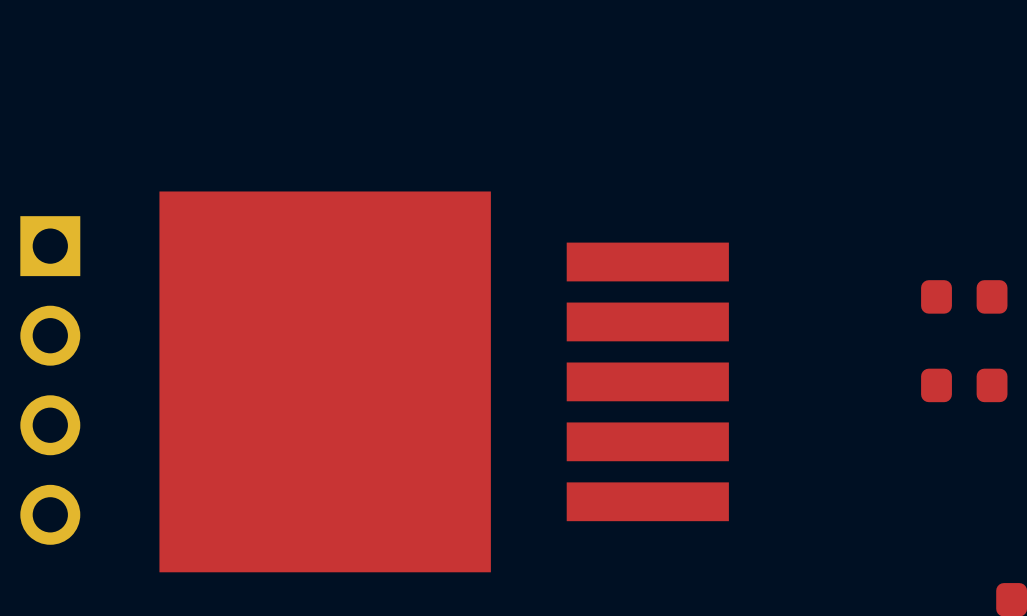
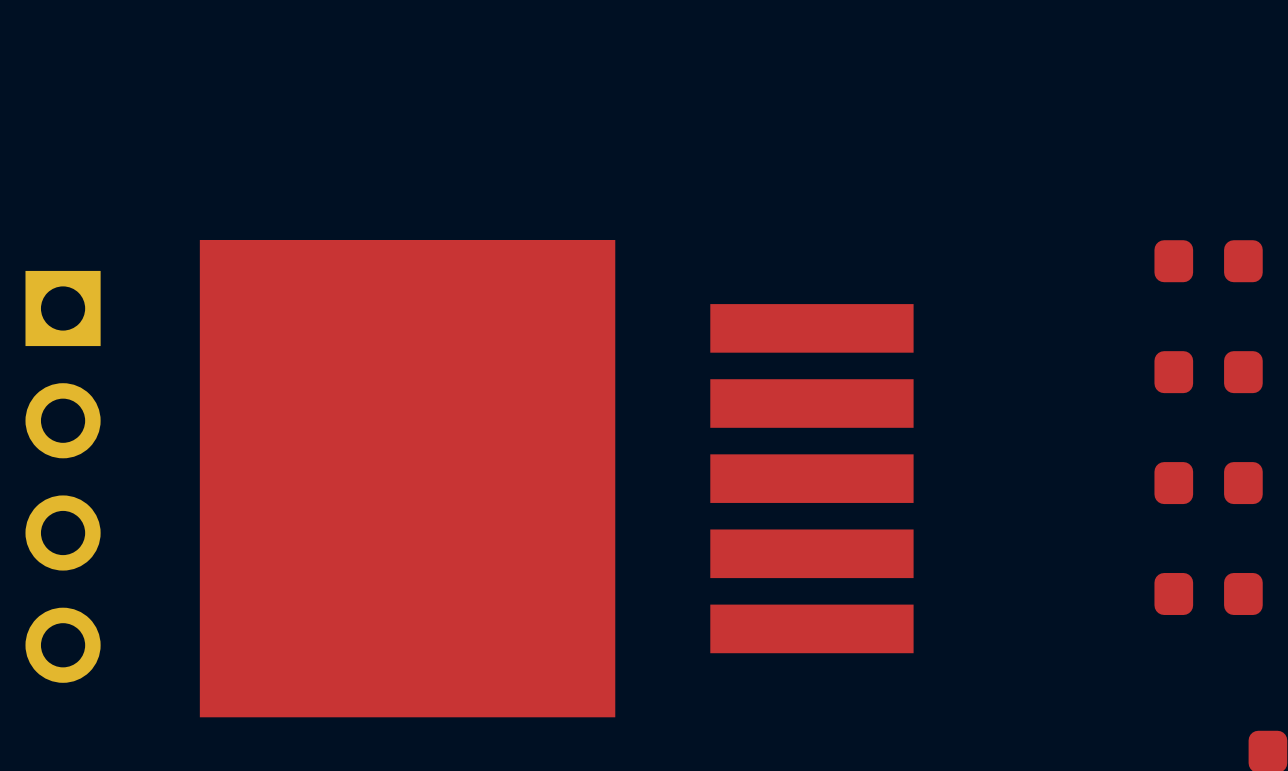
part: none -> (1208, 261)
part: none -> (1208, 594)

